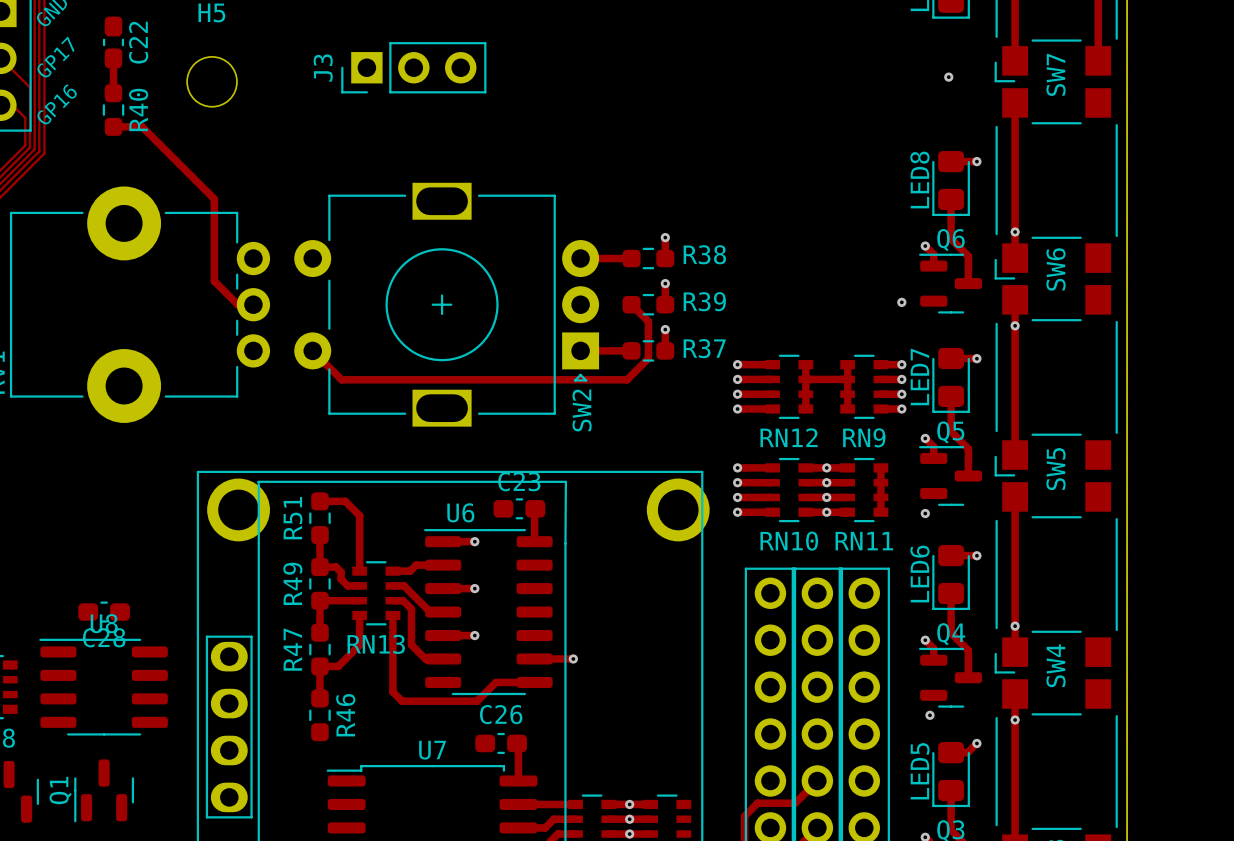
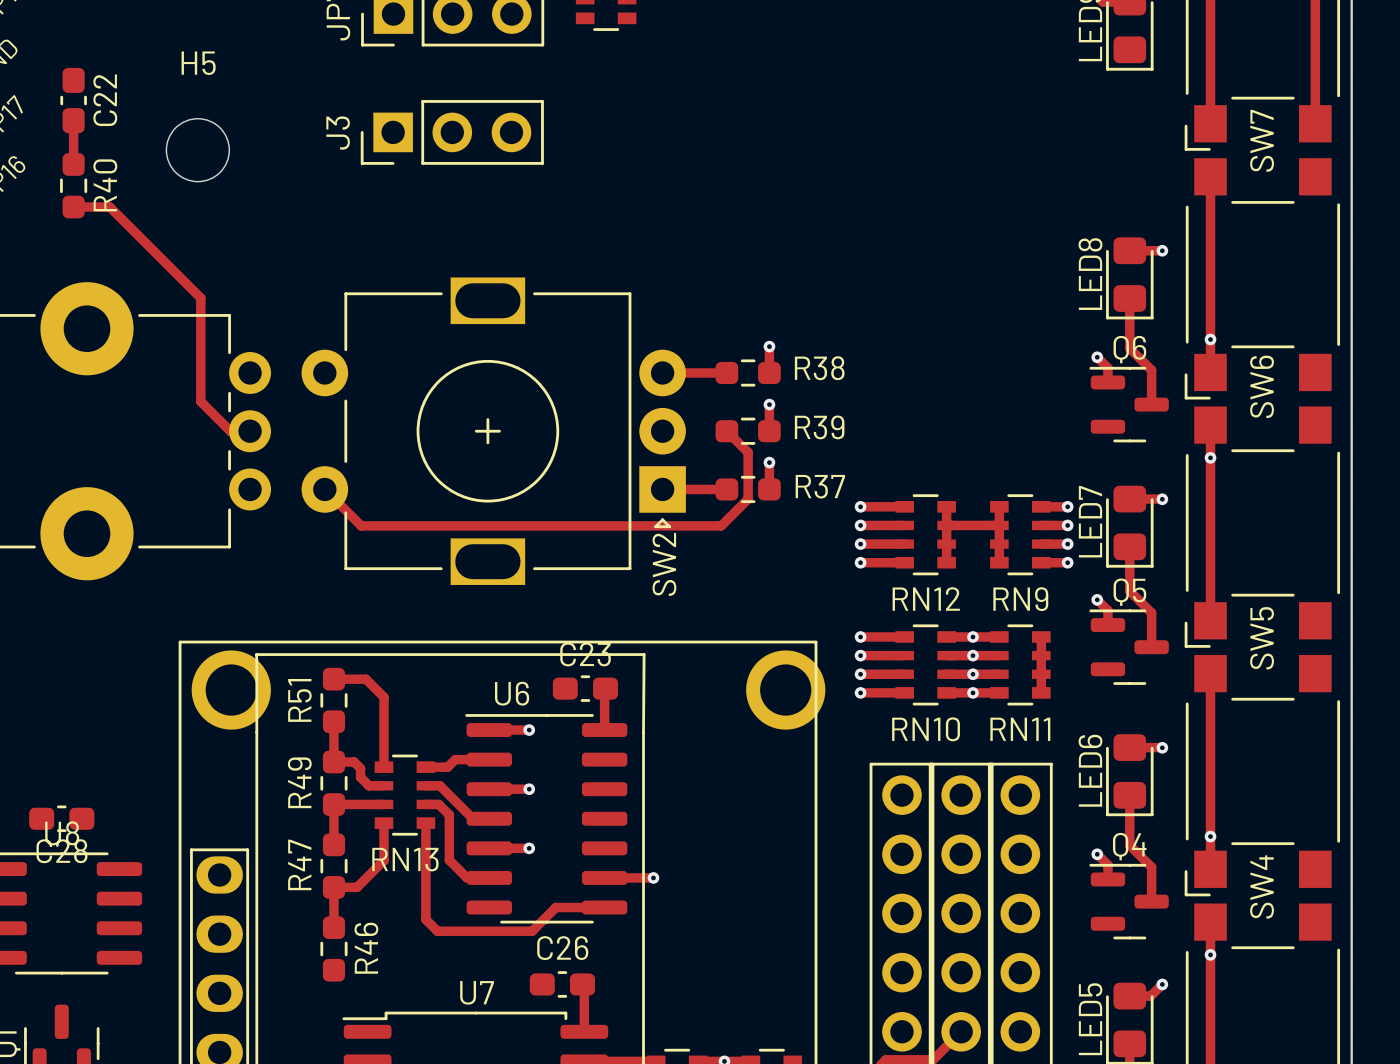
via: (948, 77) -> none
via: (901, 302) -> none
via: (925, 513) -> none
via: (929, 715) -> none

